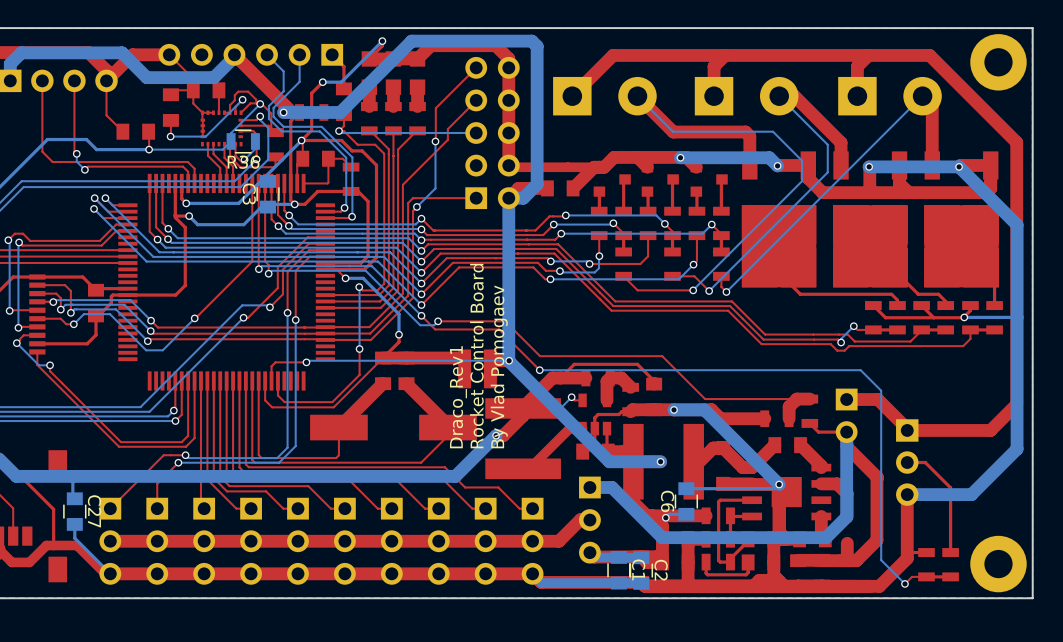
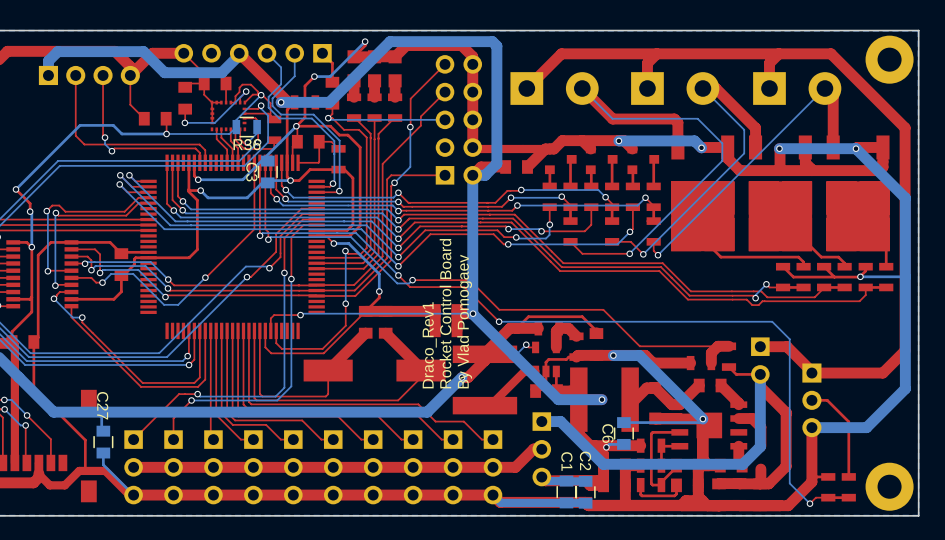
C27 name position: C27 (94, 511) -> C27 (102, 405)
C1 name position: C1 (638, 569) -> C1 (566, 461)
C2 name position: C2 (661, 570) -> C2 (585, 460)

